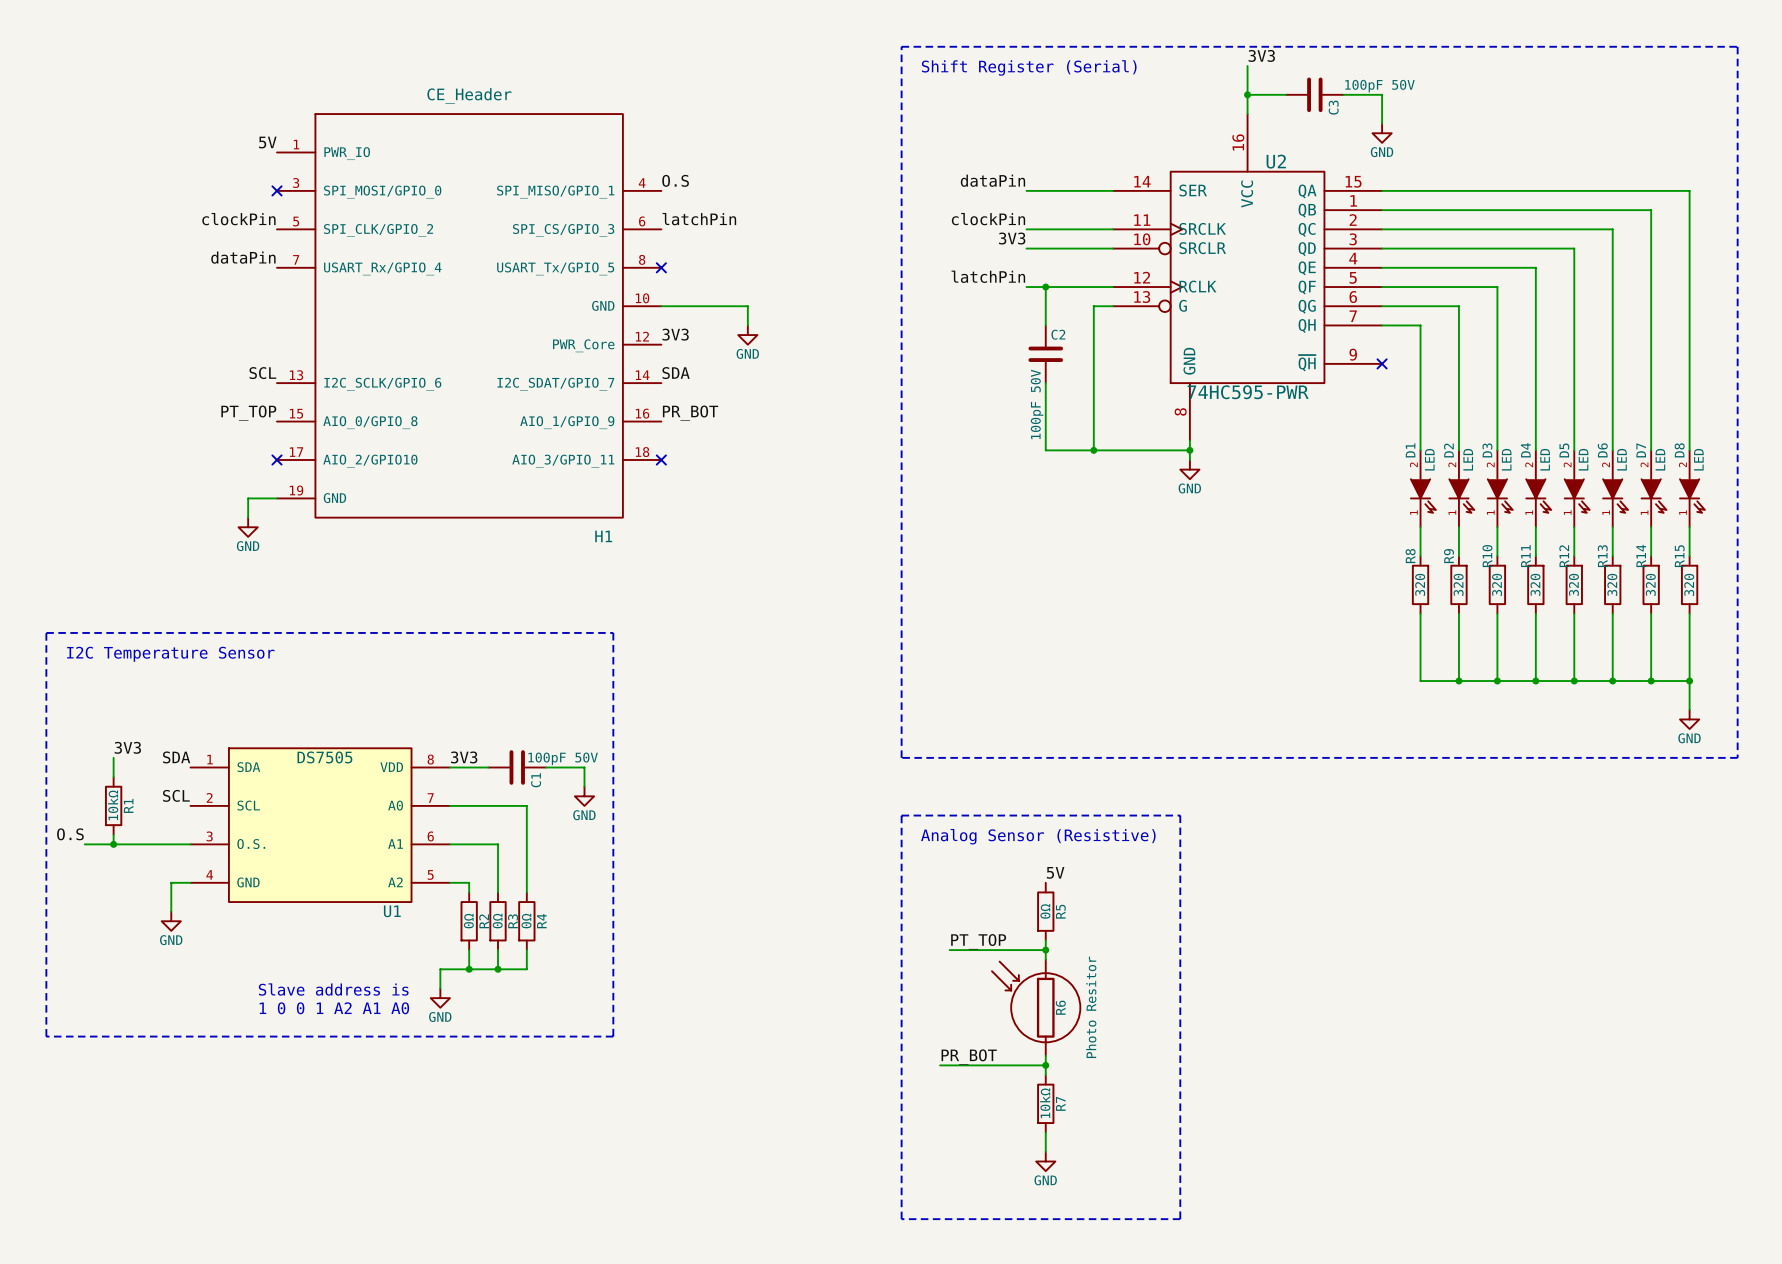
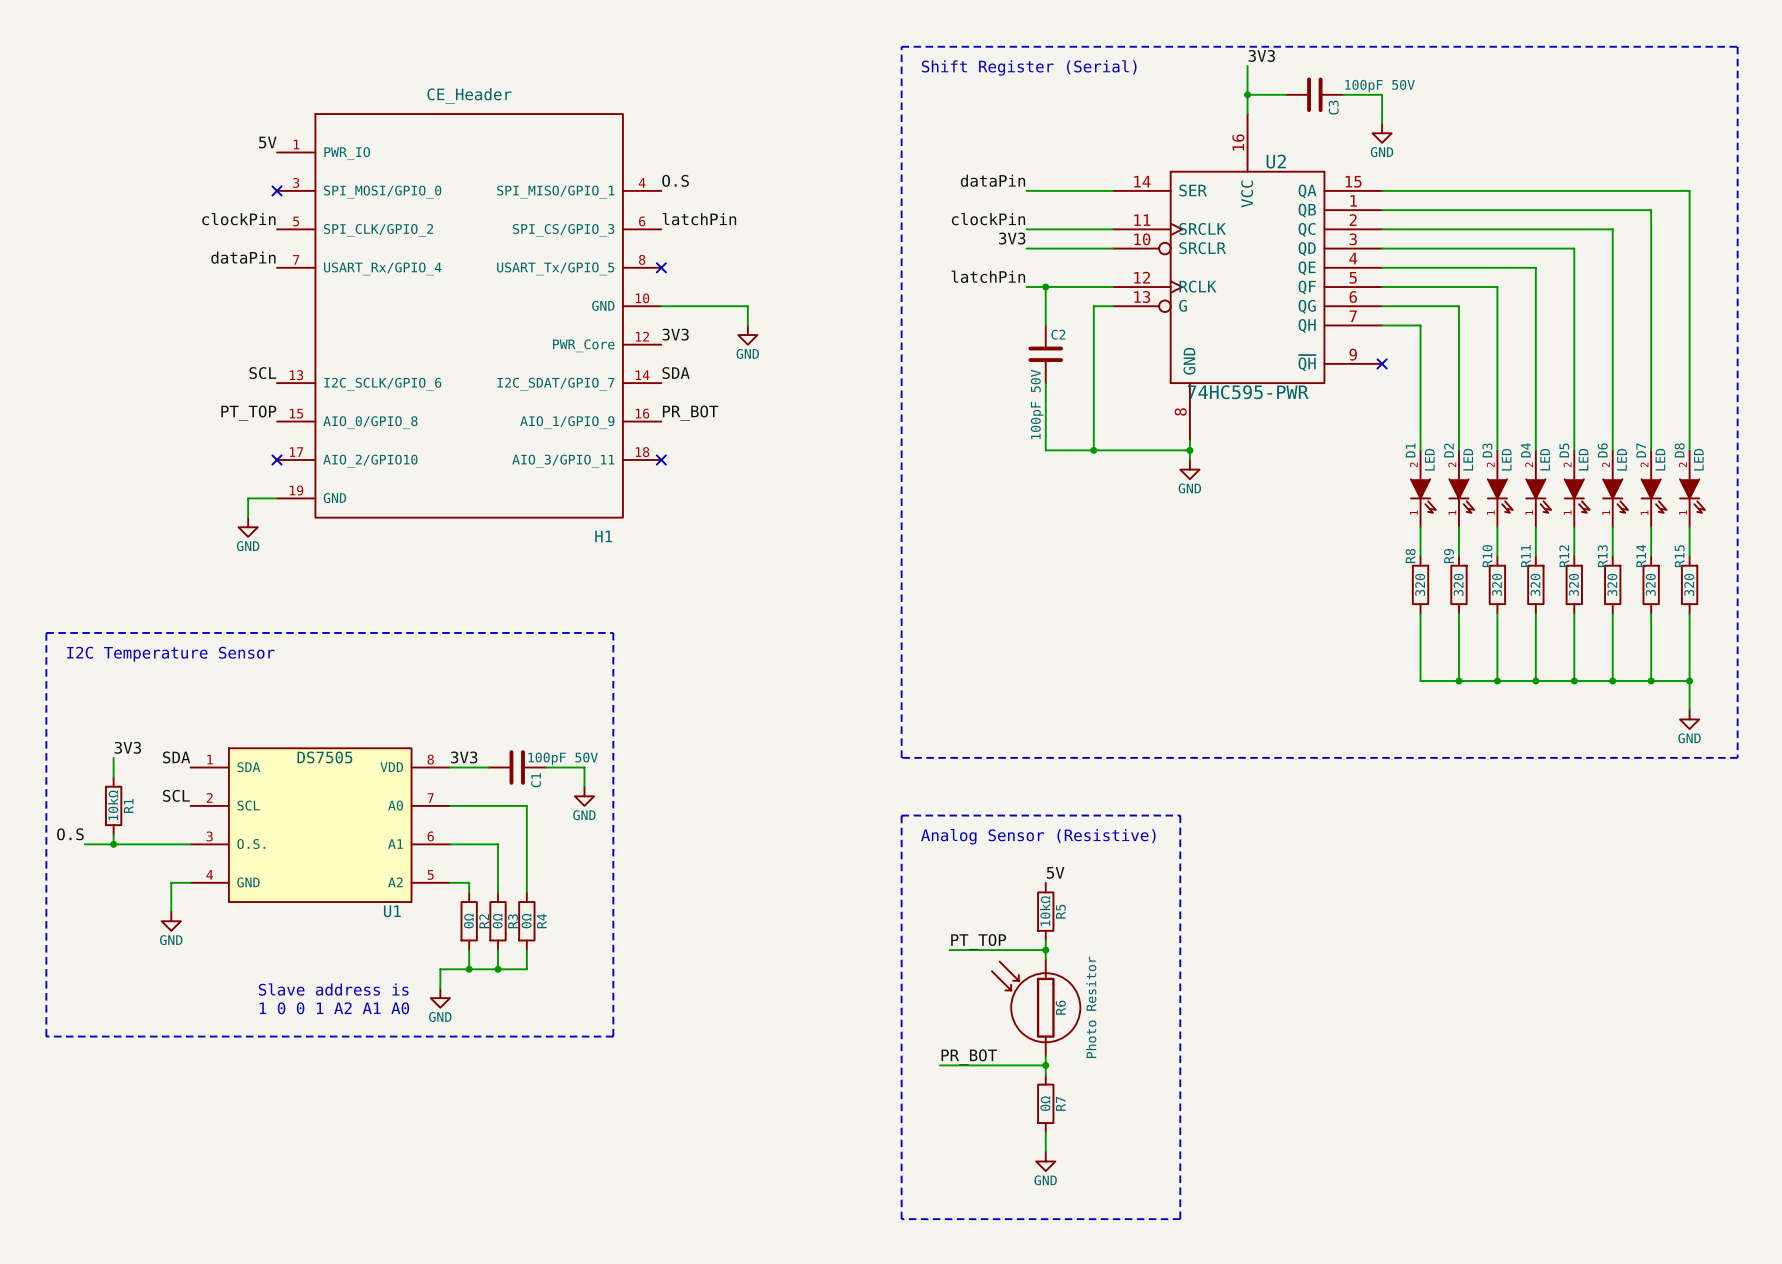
R5 value: 0Ω (1045, 911) -> 10kΩ (1045, 911)
R7 value: 10kΩ (1045, 1103) -> 0Ω (1045, 1103)

